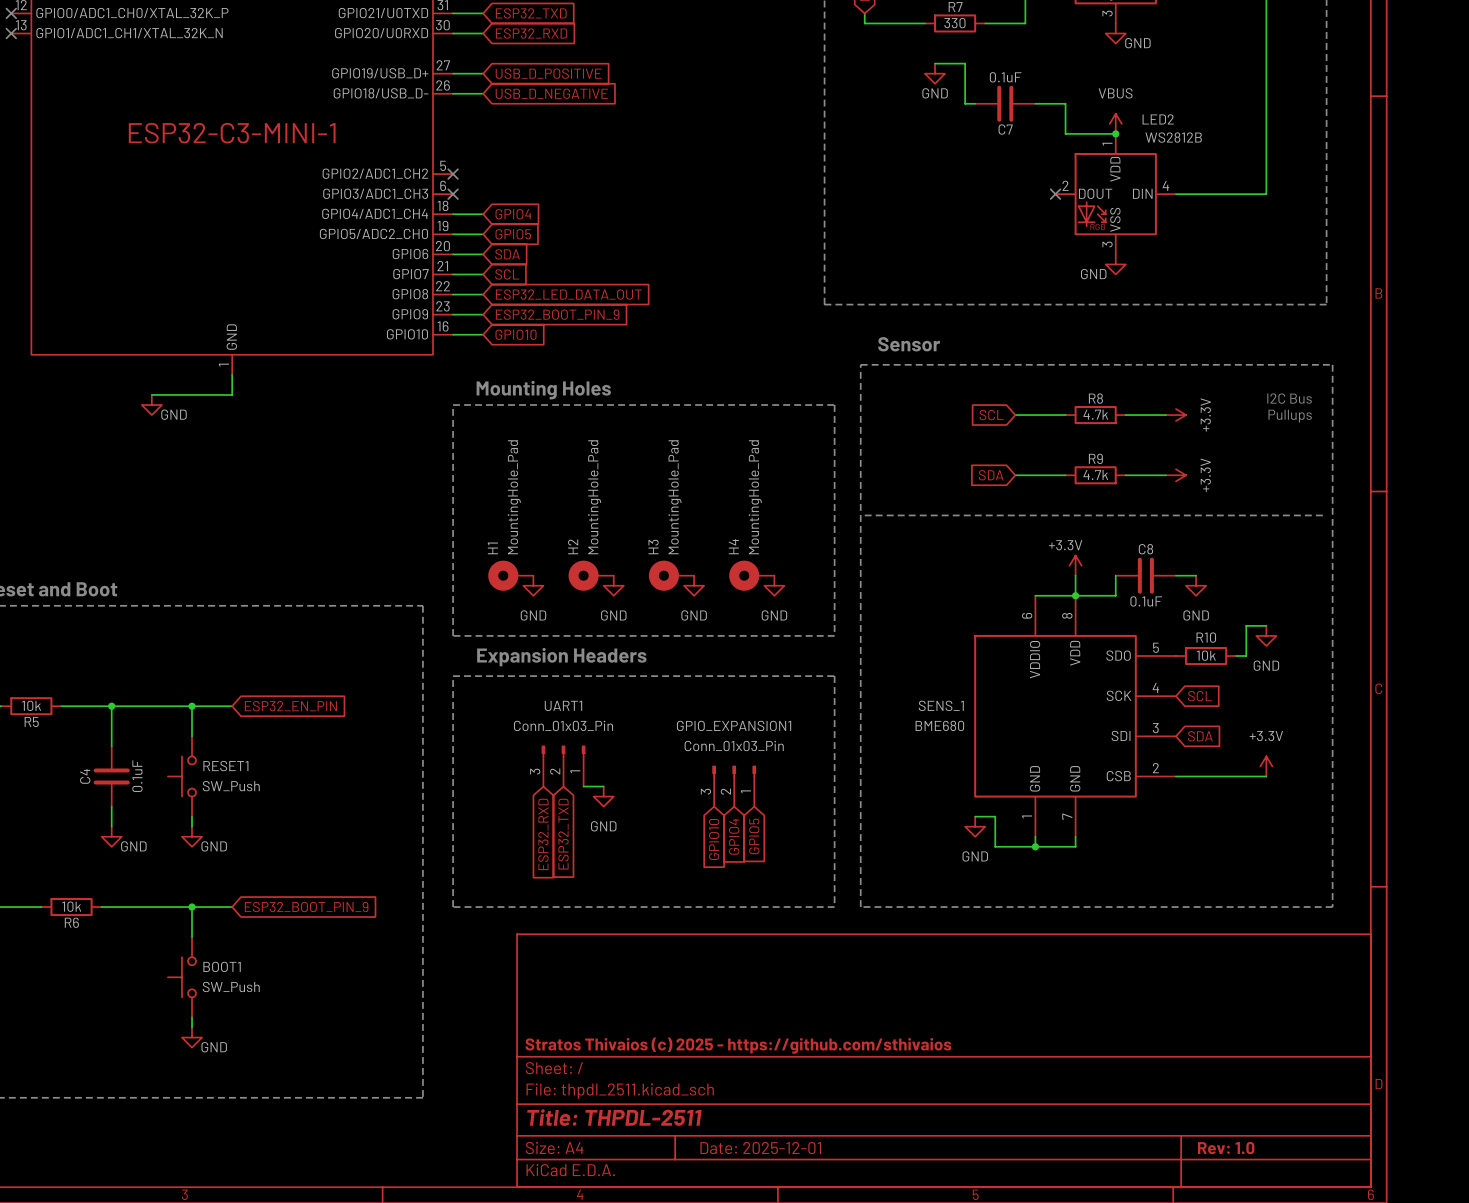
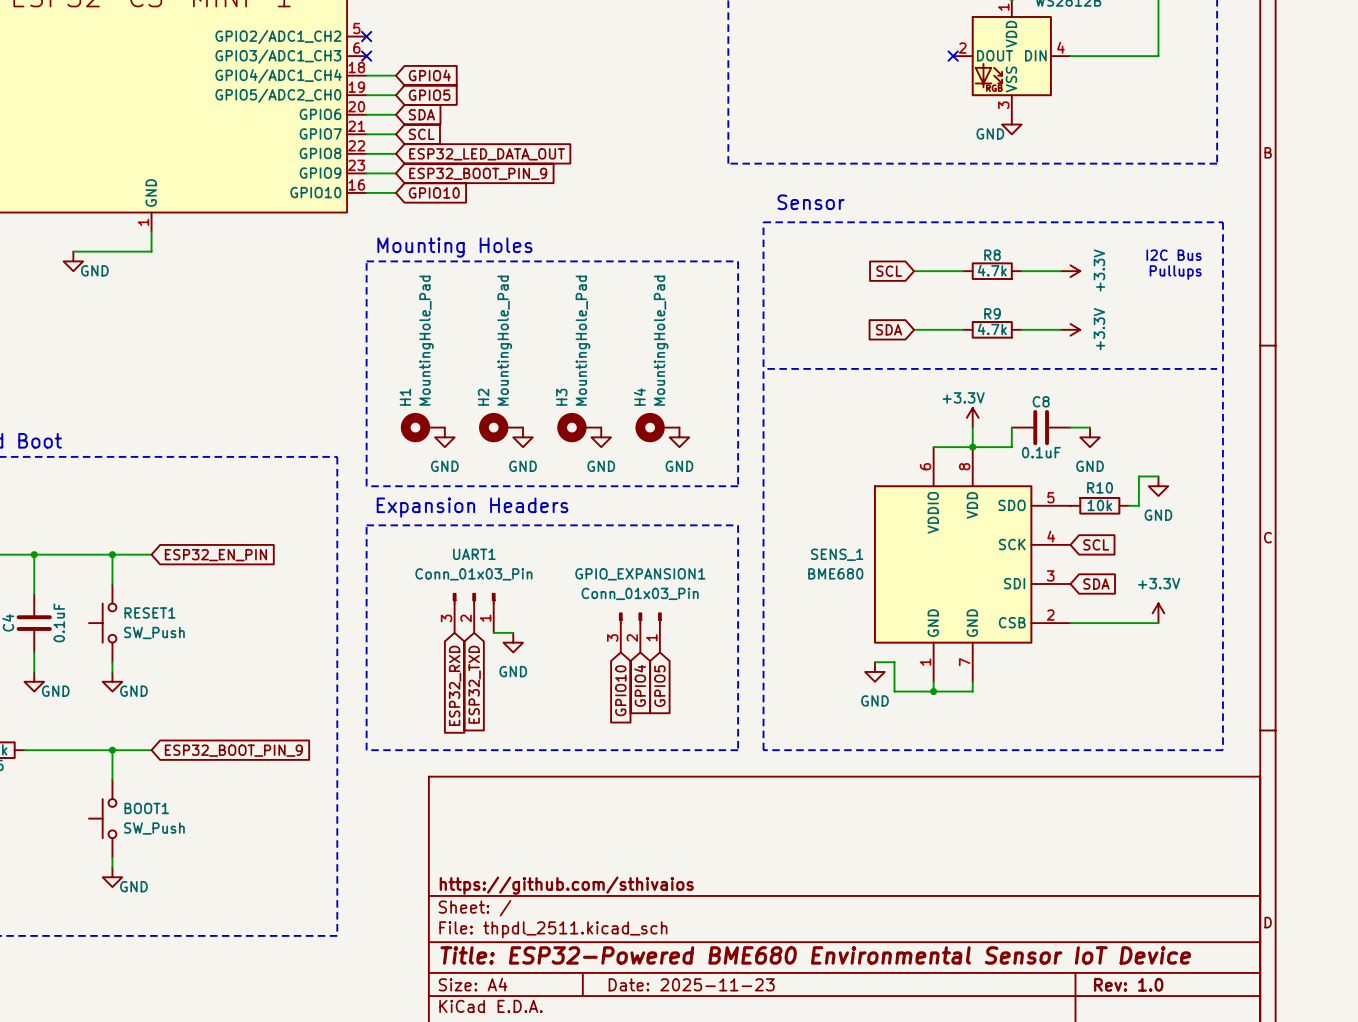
title block: Stratos Thivaios (c) 2025 - https://github.com/sthivaios (738, 1045) -> https://github.com/sthivaios (566, 885)
title block: Title: THPDL-2511 (614, 1117) -> Title: ESP32-Powered BME680 Environmental Sensor IoT Device (815, 955)
title block: Date: 2025-12-01 (760, 1148) -> Date: 2025-11-23 (691, 984)

